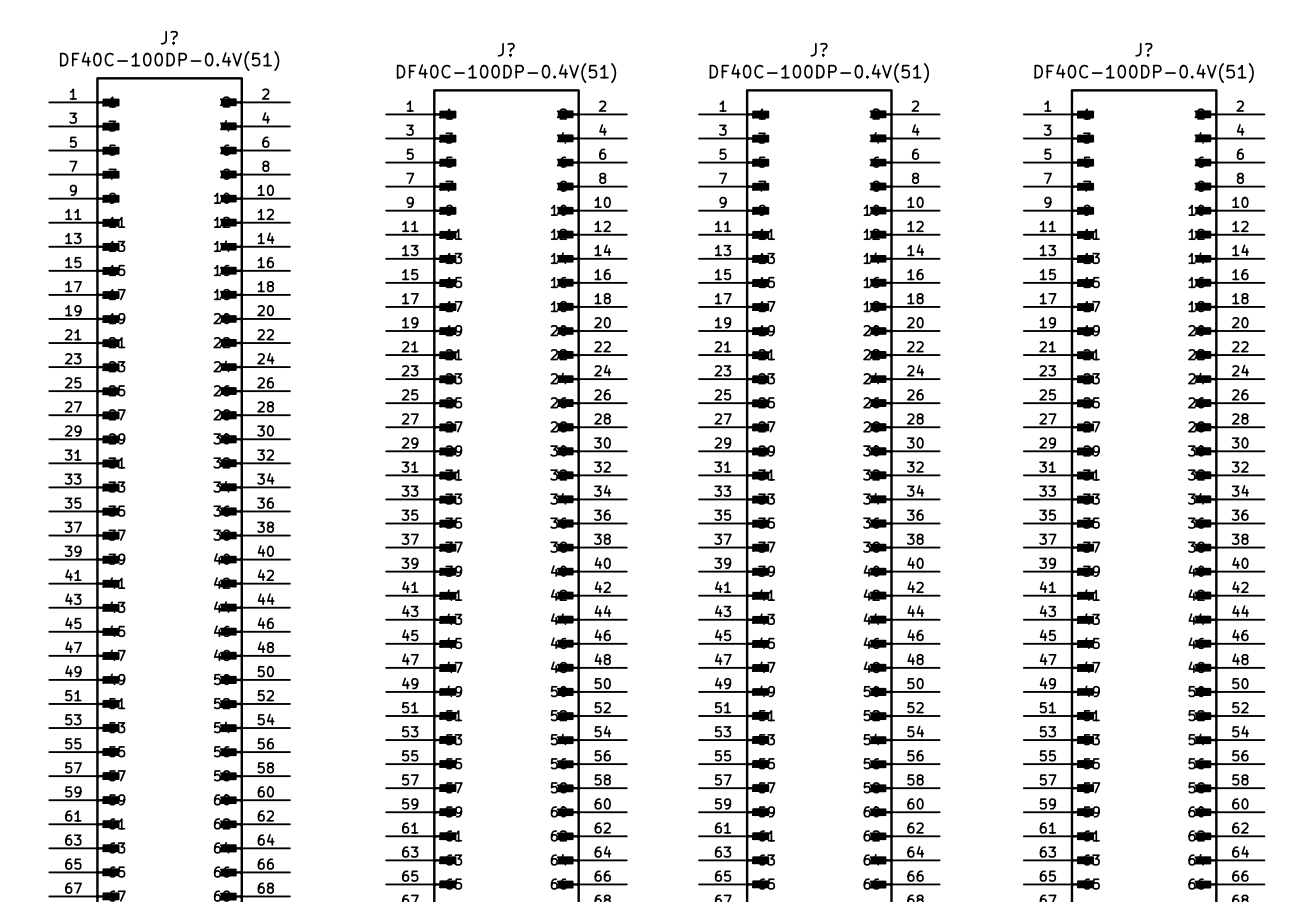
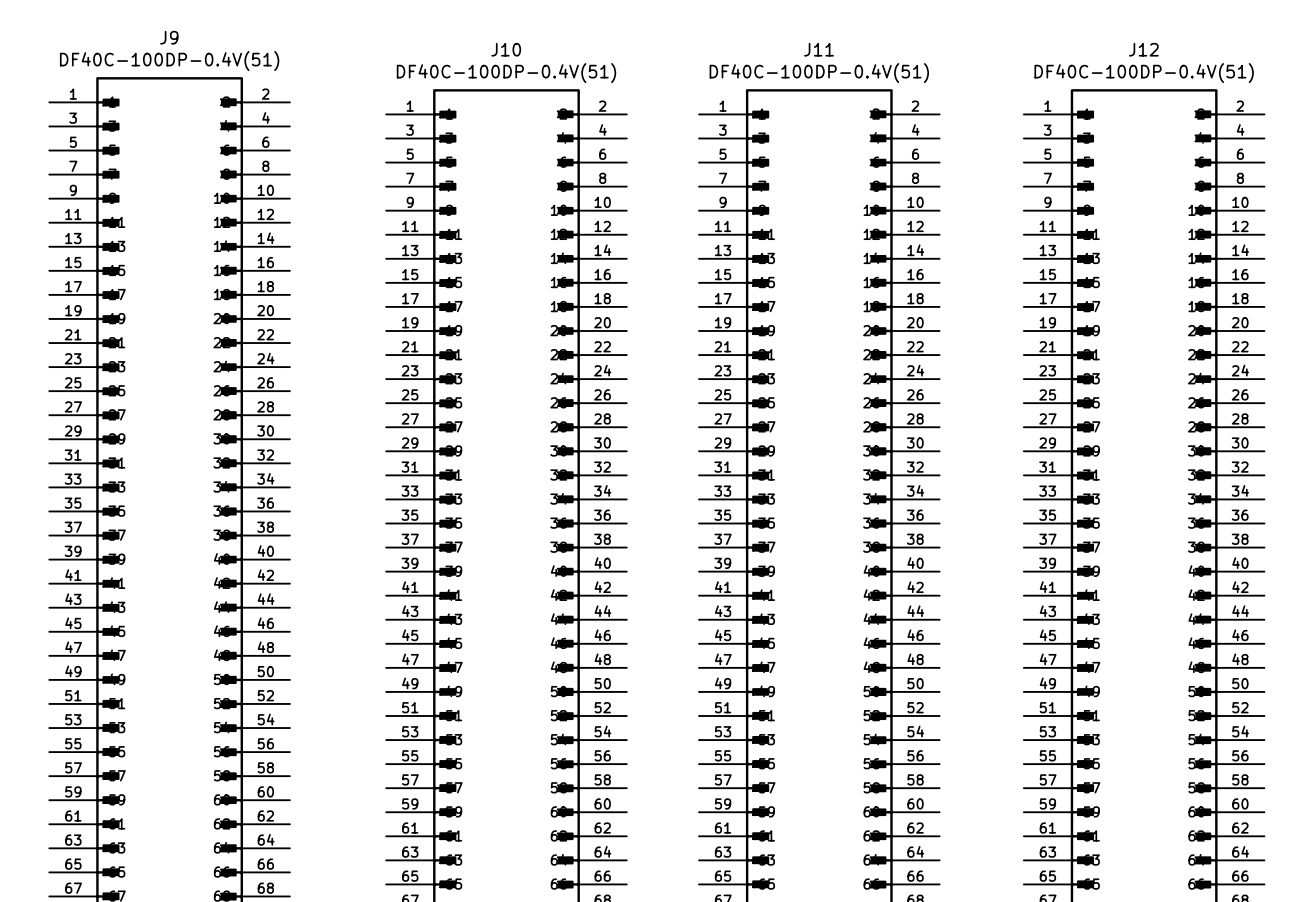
J? name: J? (169, 37) -> J9 (169, 37)
J? name: J? (506, 49) -> J10 (506, 49)
J? name: J? (819, 49) -> J11 (819, 49)
J? name: J? (1143, 49) -> J12 (1143, 49)

